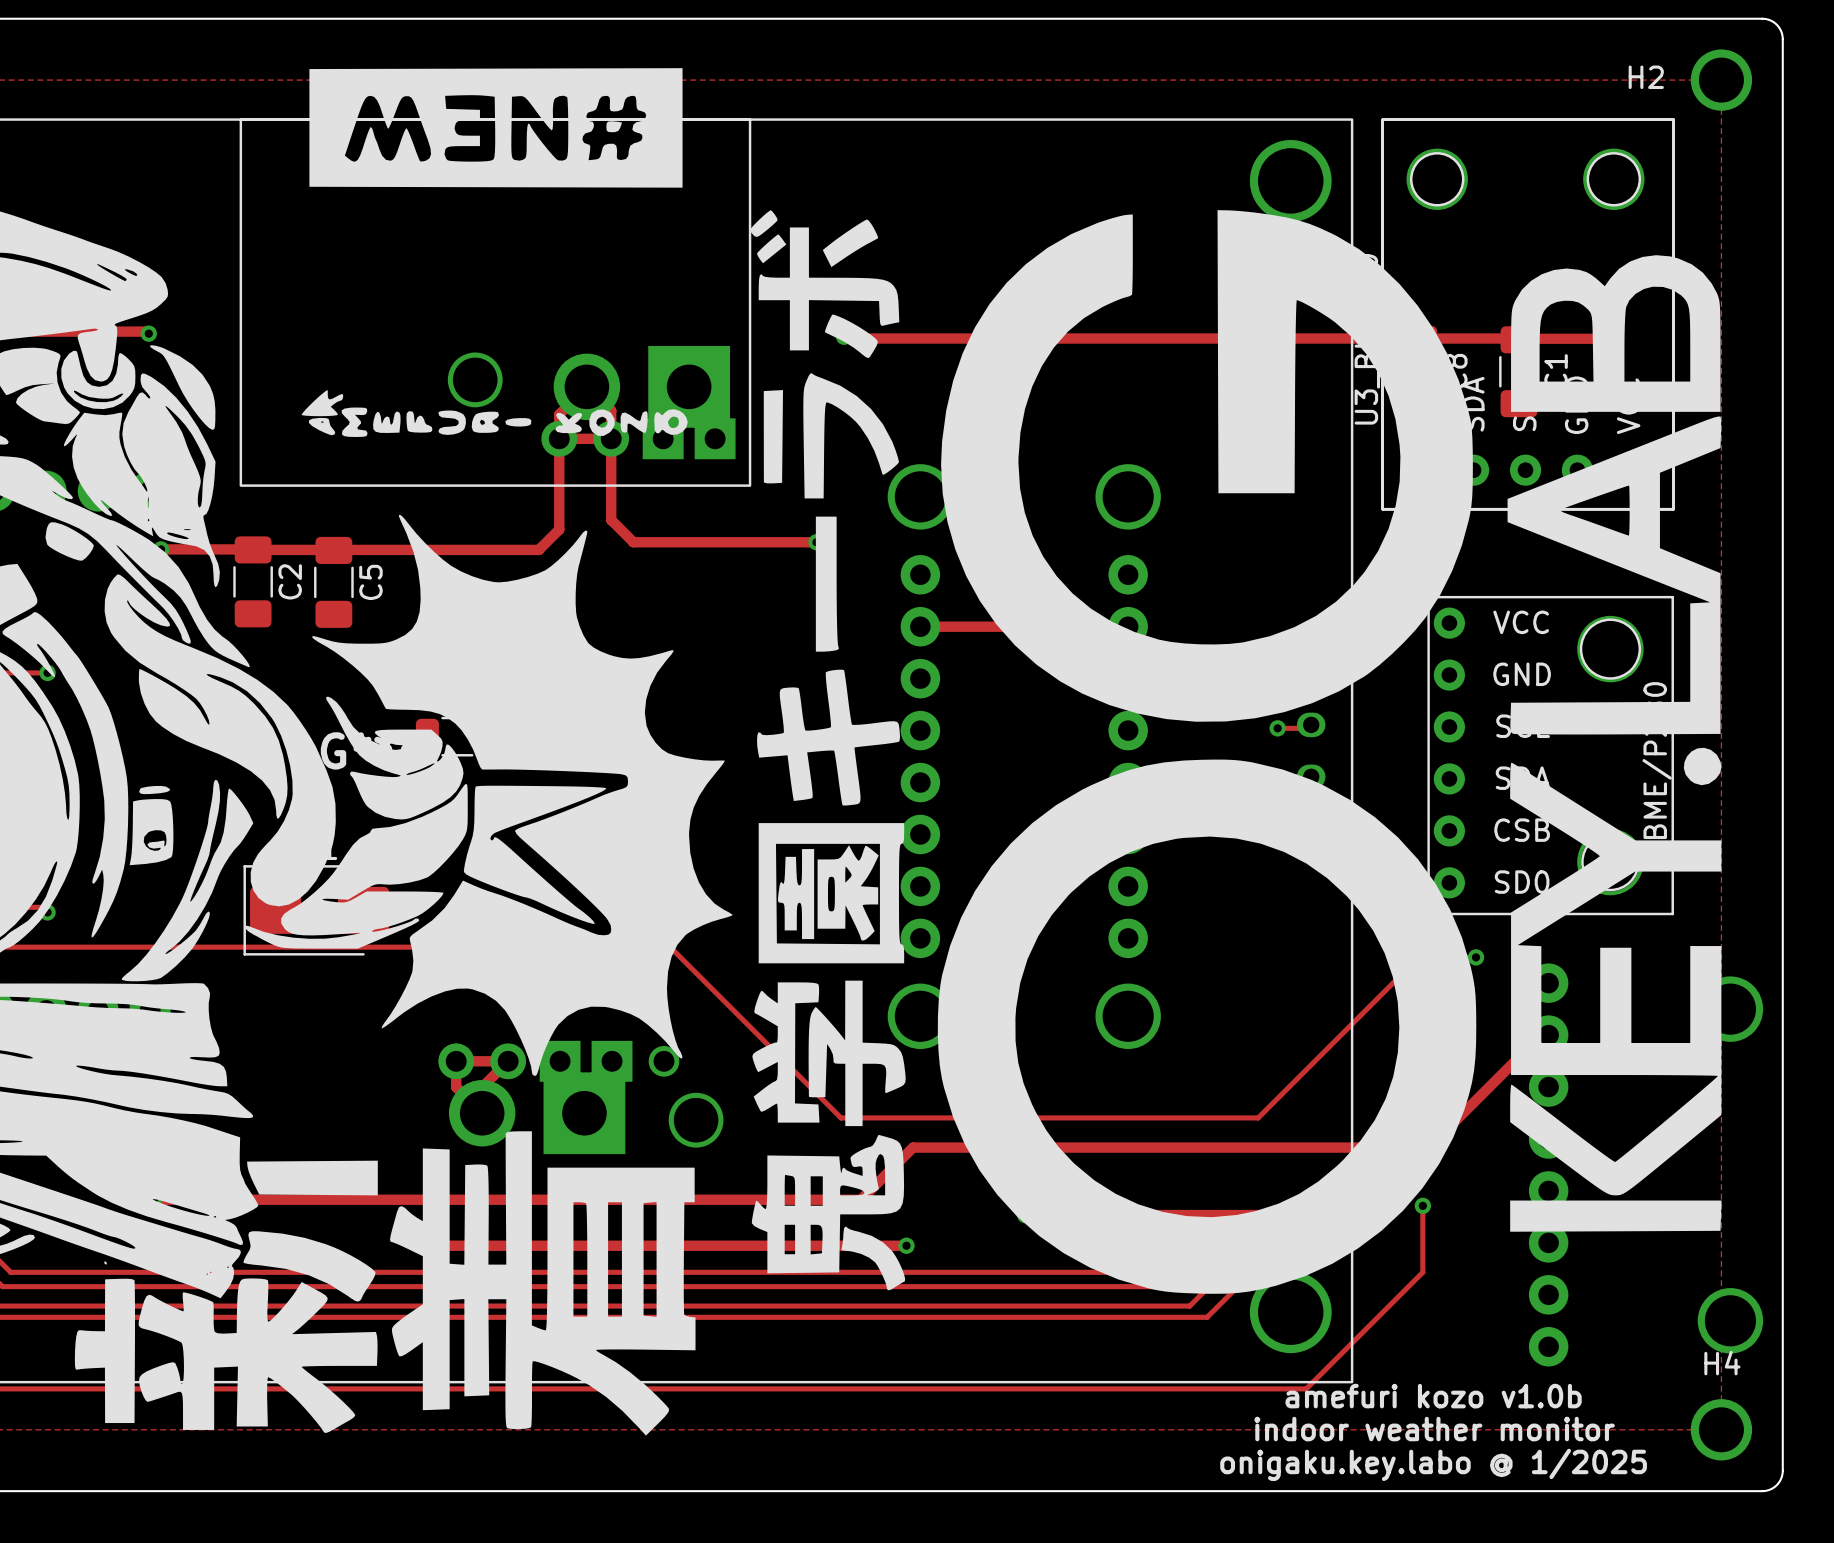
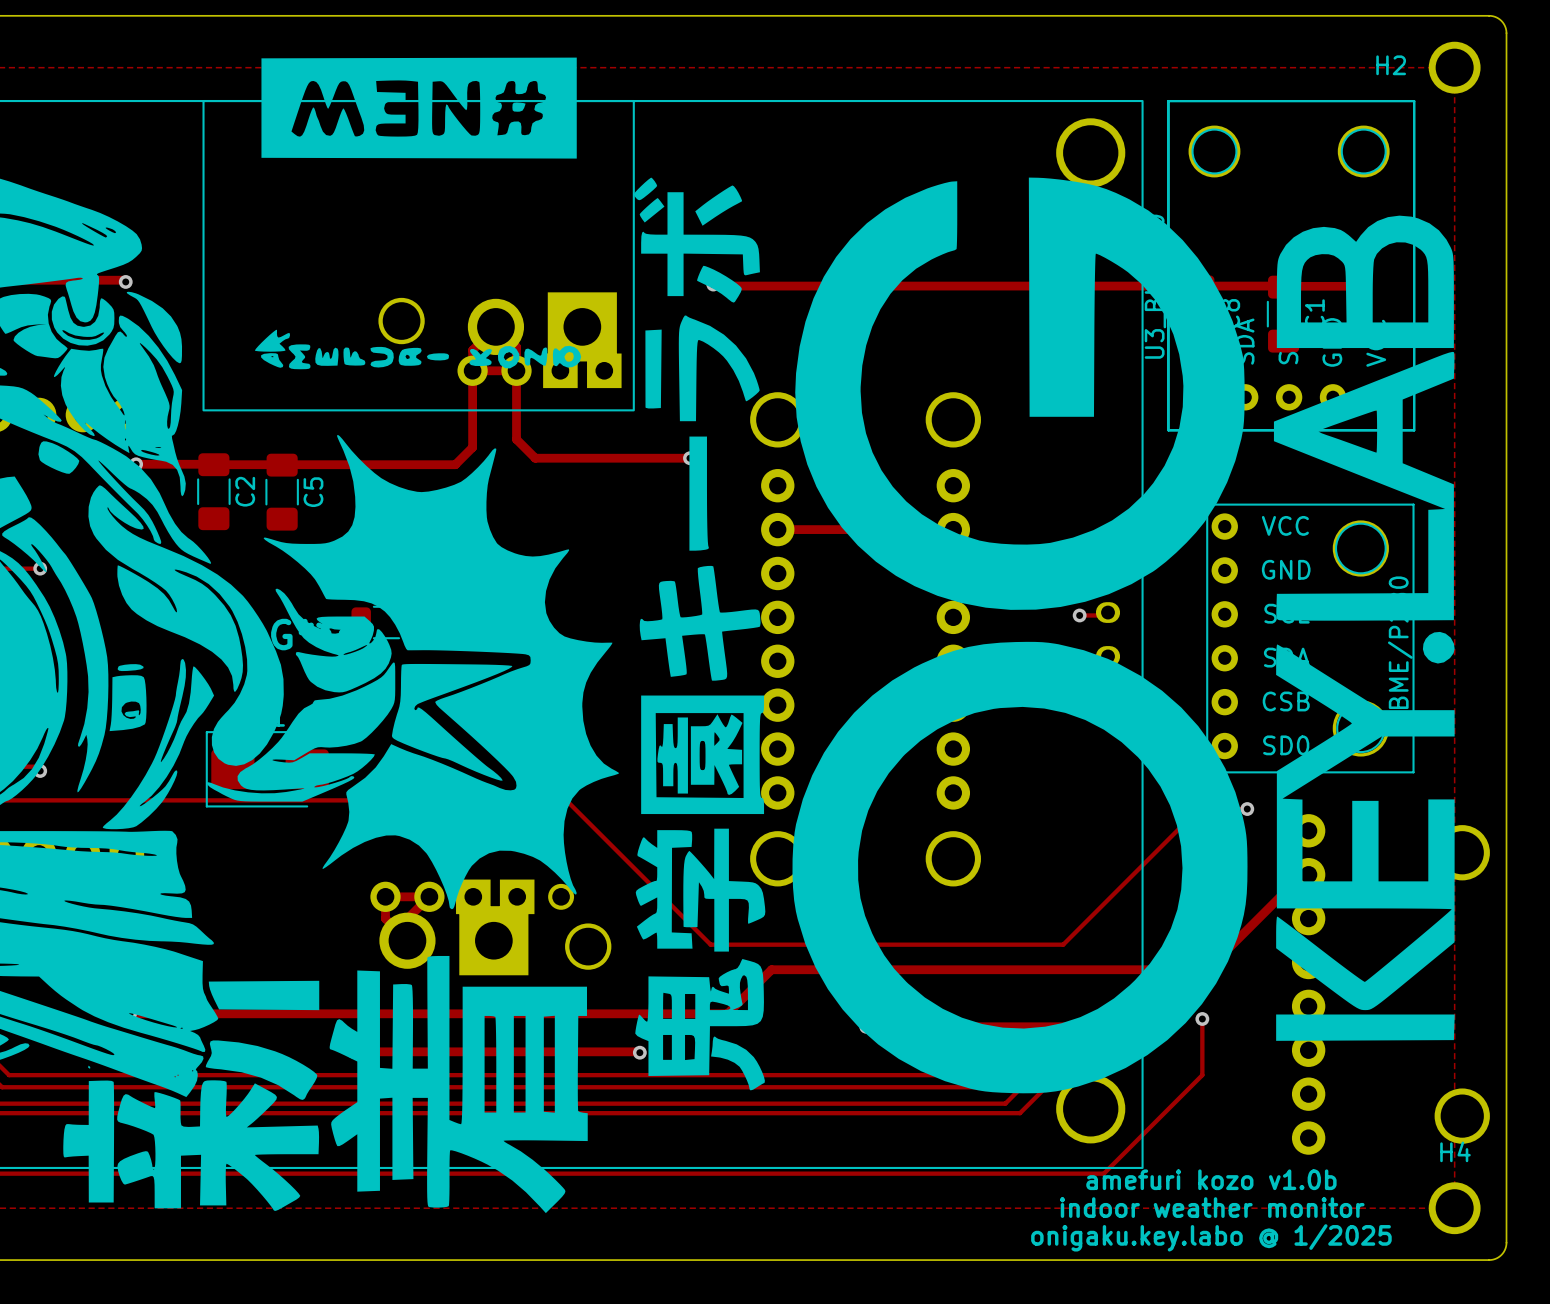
track: (418, 1244) (906, 1245) -> (353, 1051) (639, 1052)
via: none -> (639, 1052)
via: (906, 1245) -> none

